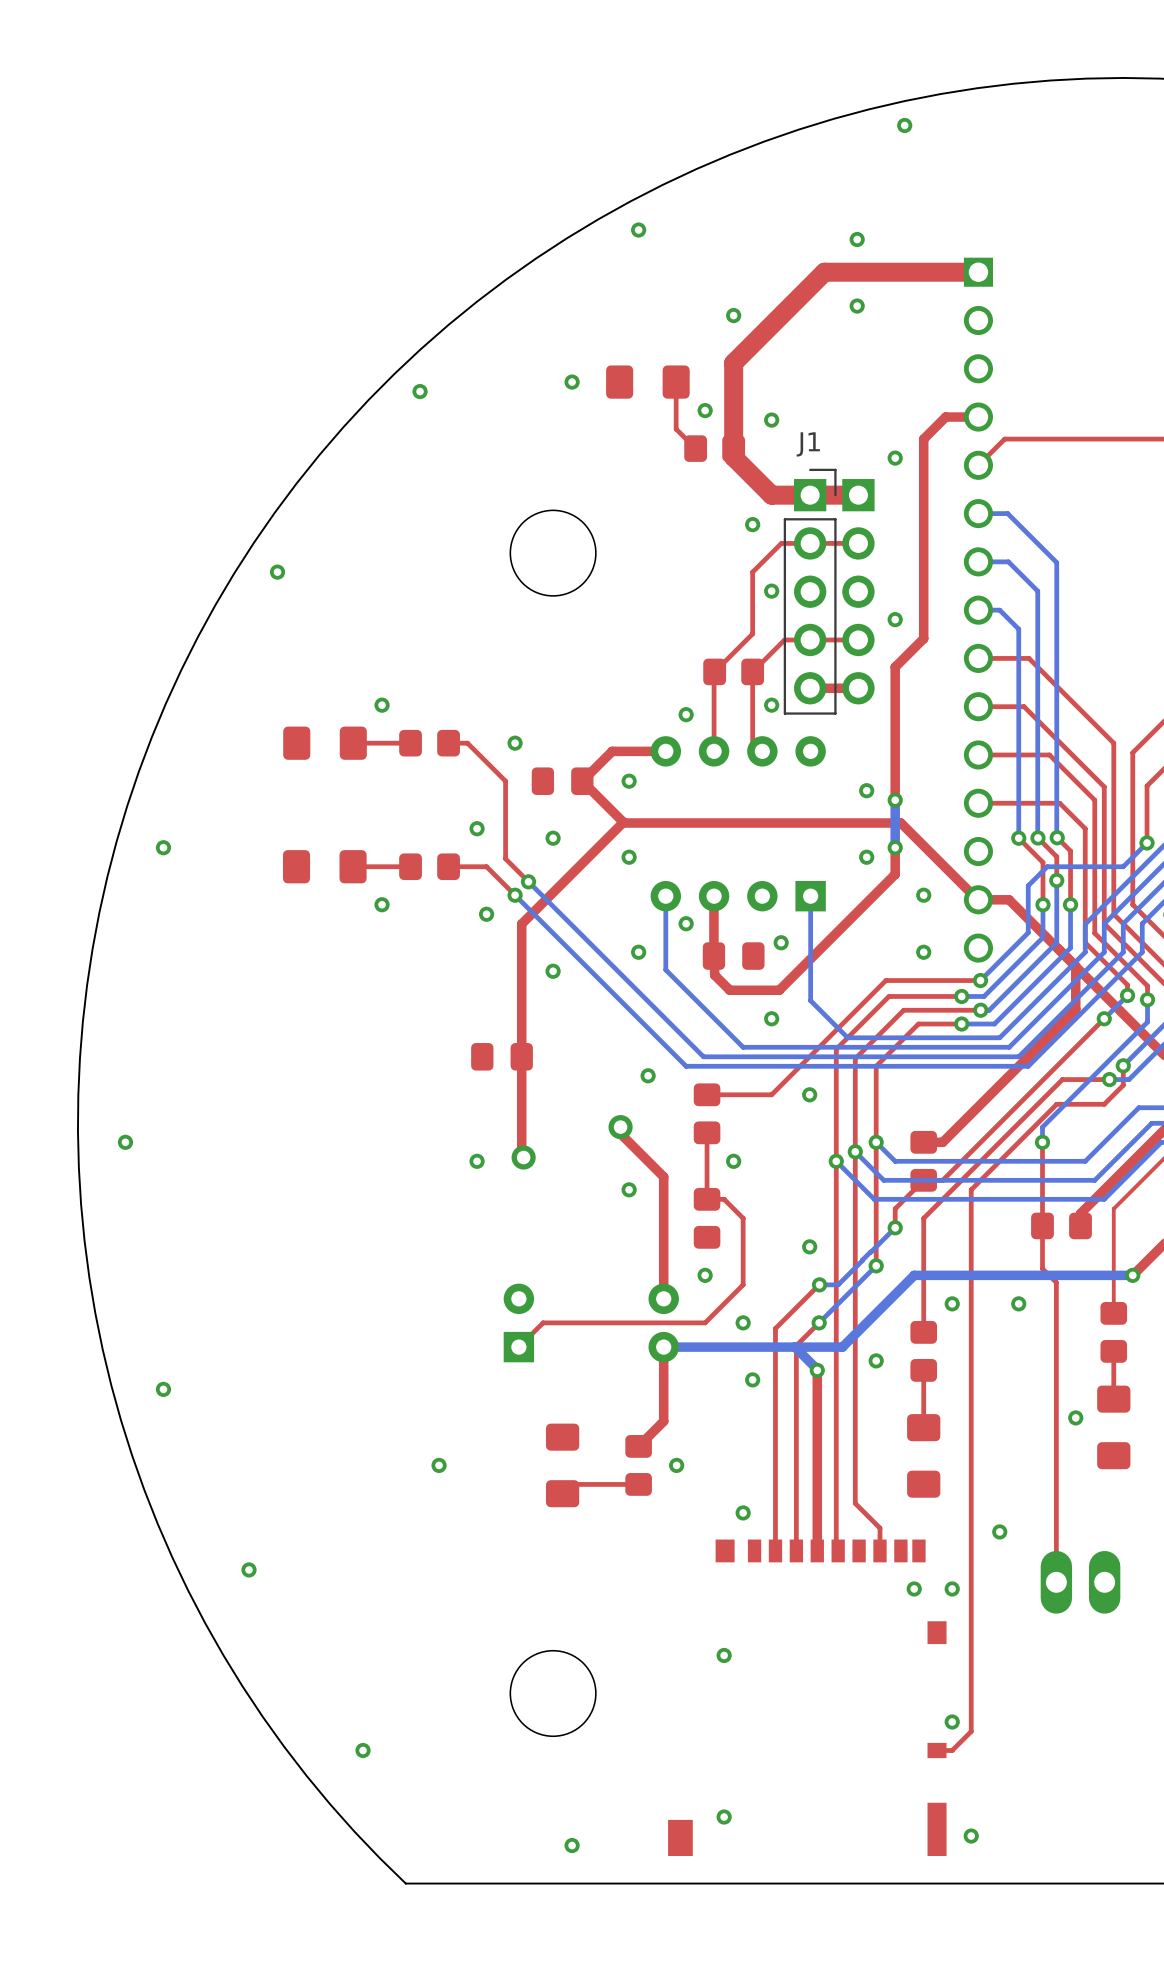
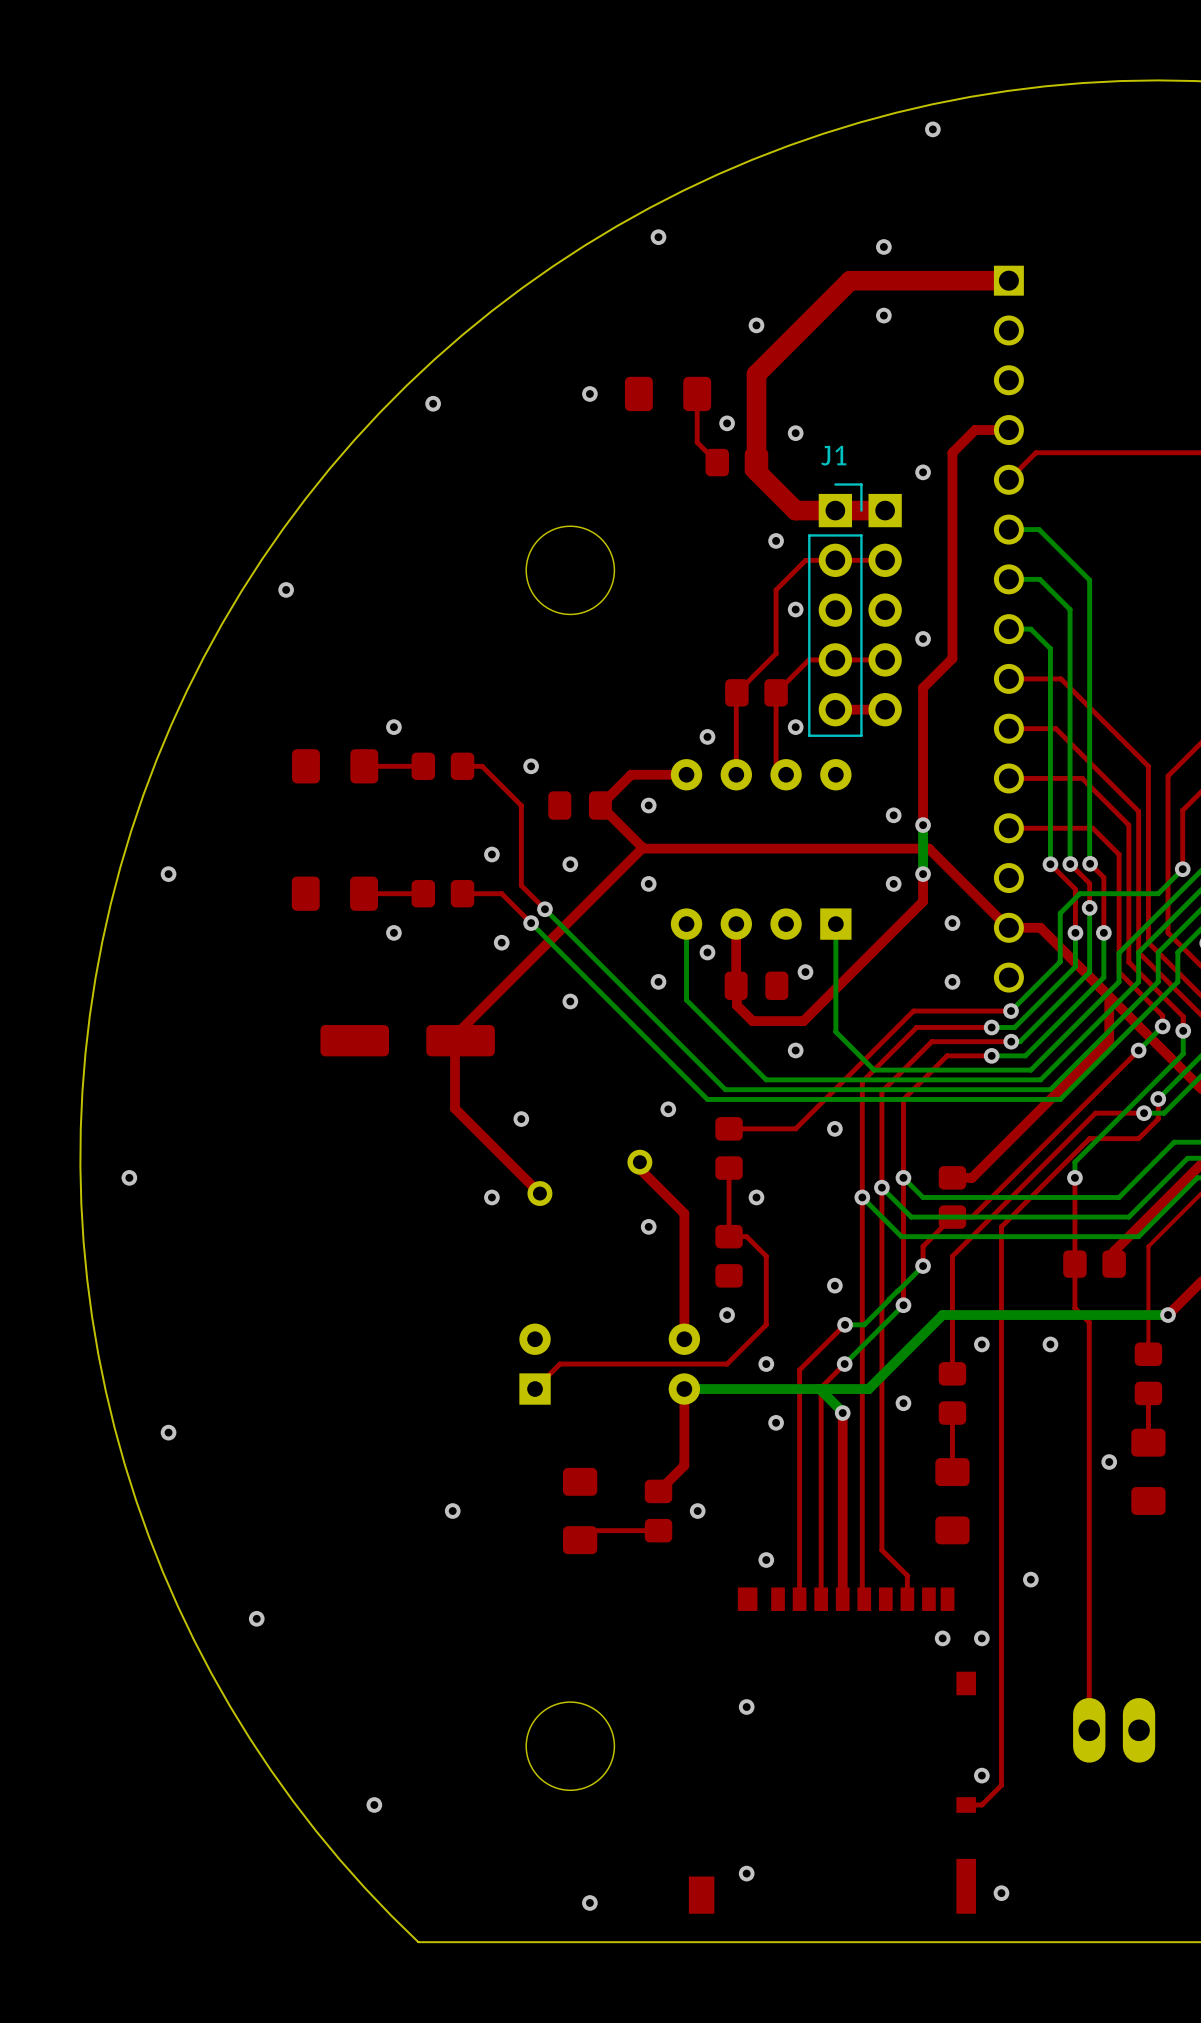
top track: (521, 923) (521, 1155) -> (537, 952) (455, 1035) (455, 1108) (537, 1191)
part: none -> (407, 1040)
part: (502, 1056) -> none
via: none -> (521, 1119)
top track: none -> (1089, 1631) (1089, 1730)
part position: (1080, 1582) -> (1114, 1730)

